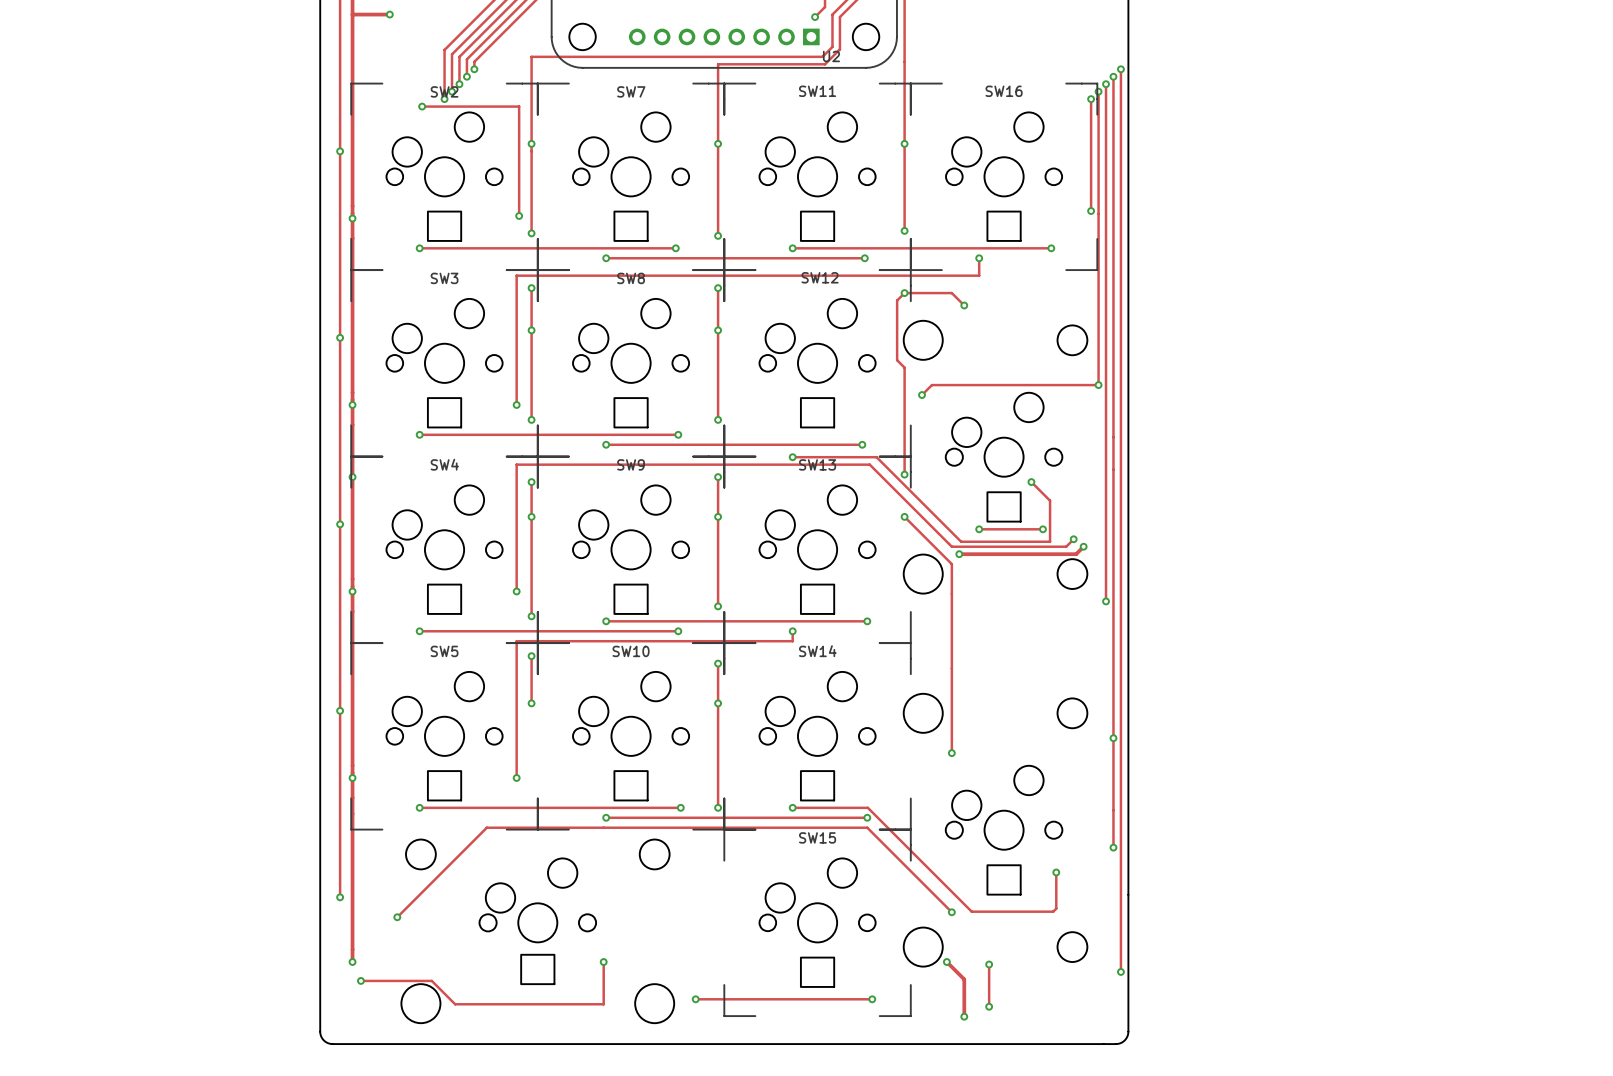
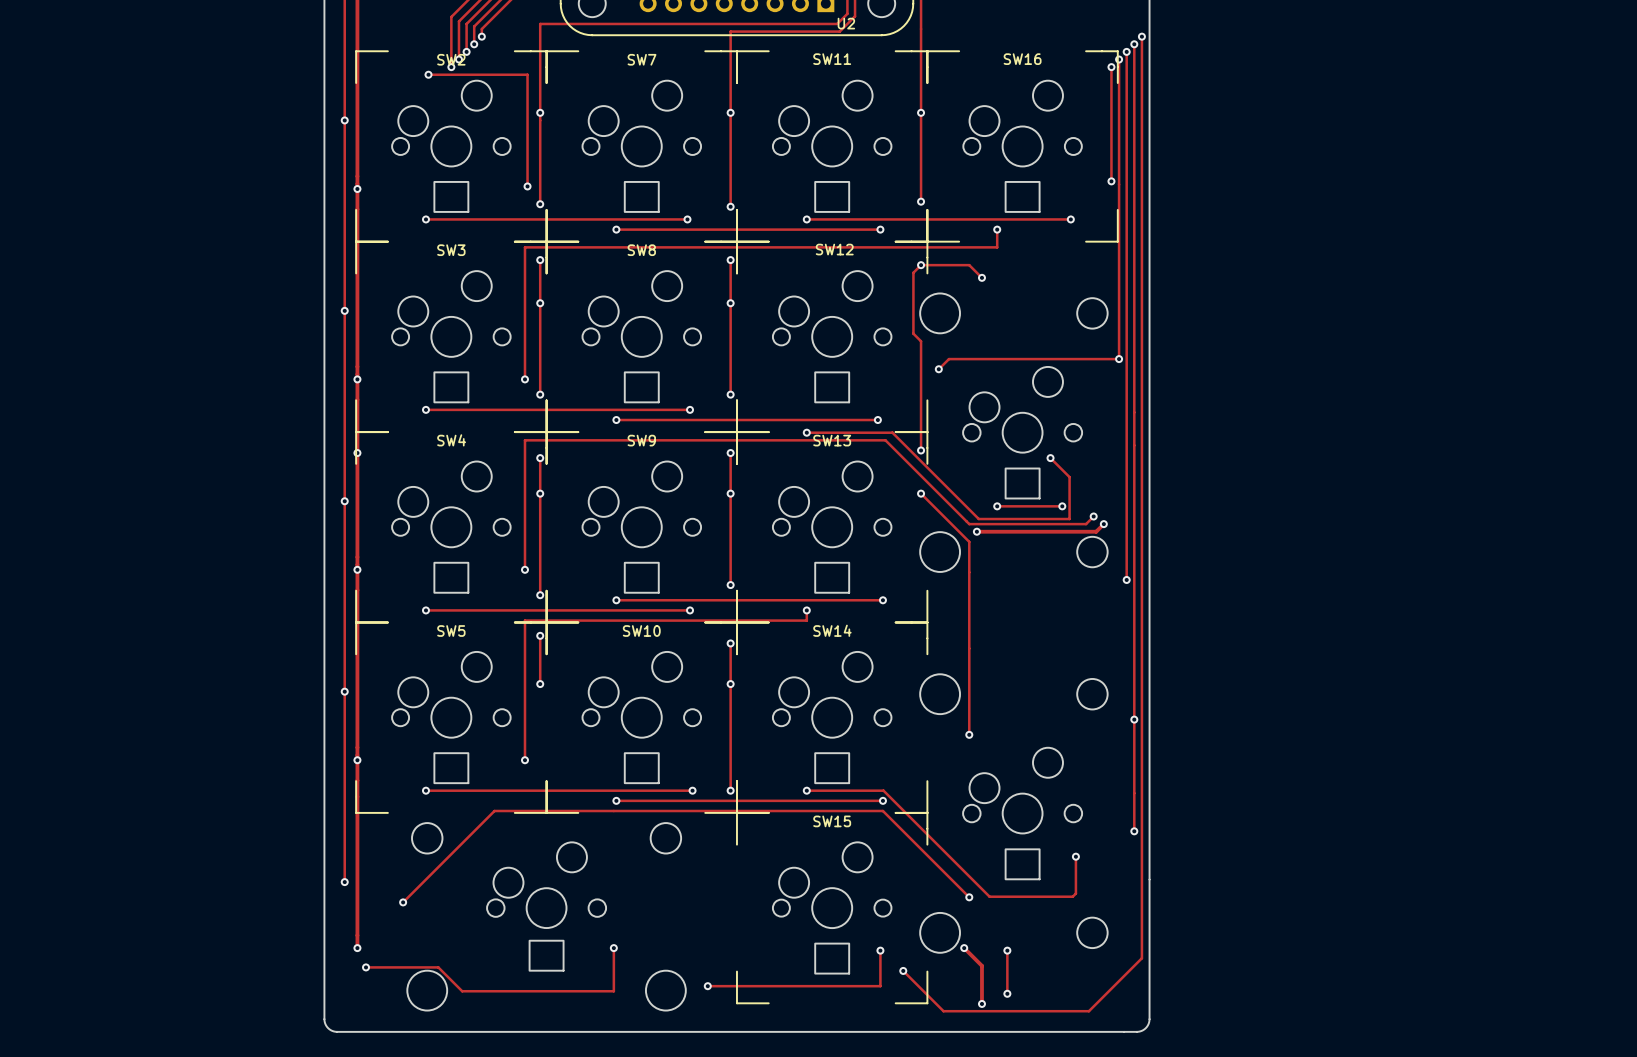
via: none -> (880, 950)
track: none -> (1141, 958) (1088, 1011) (943, 1011) (903, 970)
via: (1120, 971) -> none
via: none -> (903, 970)
track: (864, 999) (872, 999) -> (880, 986) (880, 950)
via: (872, 999) -> none

